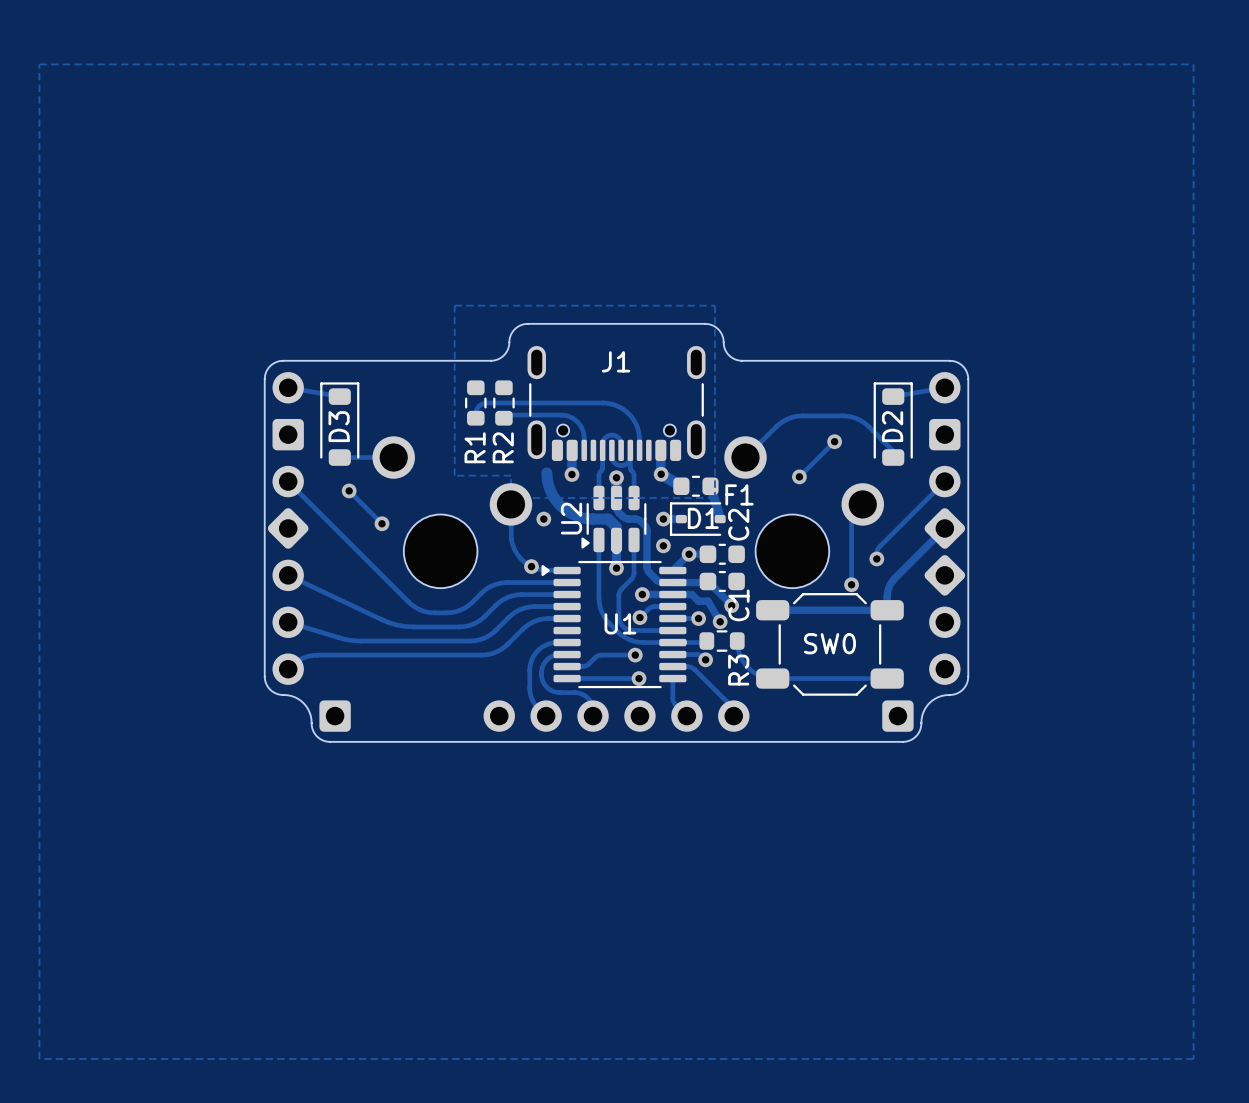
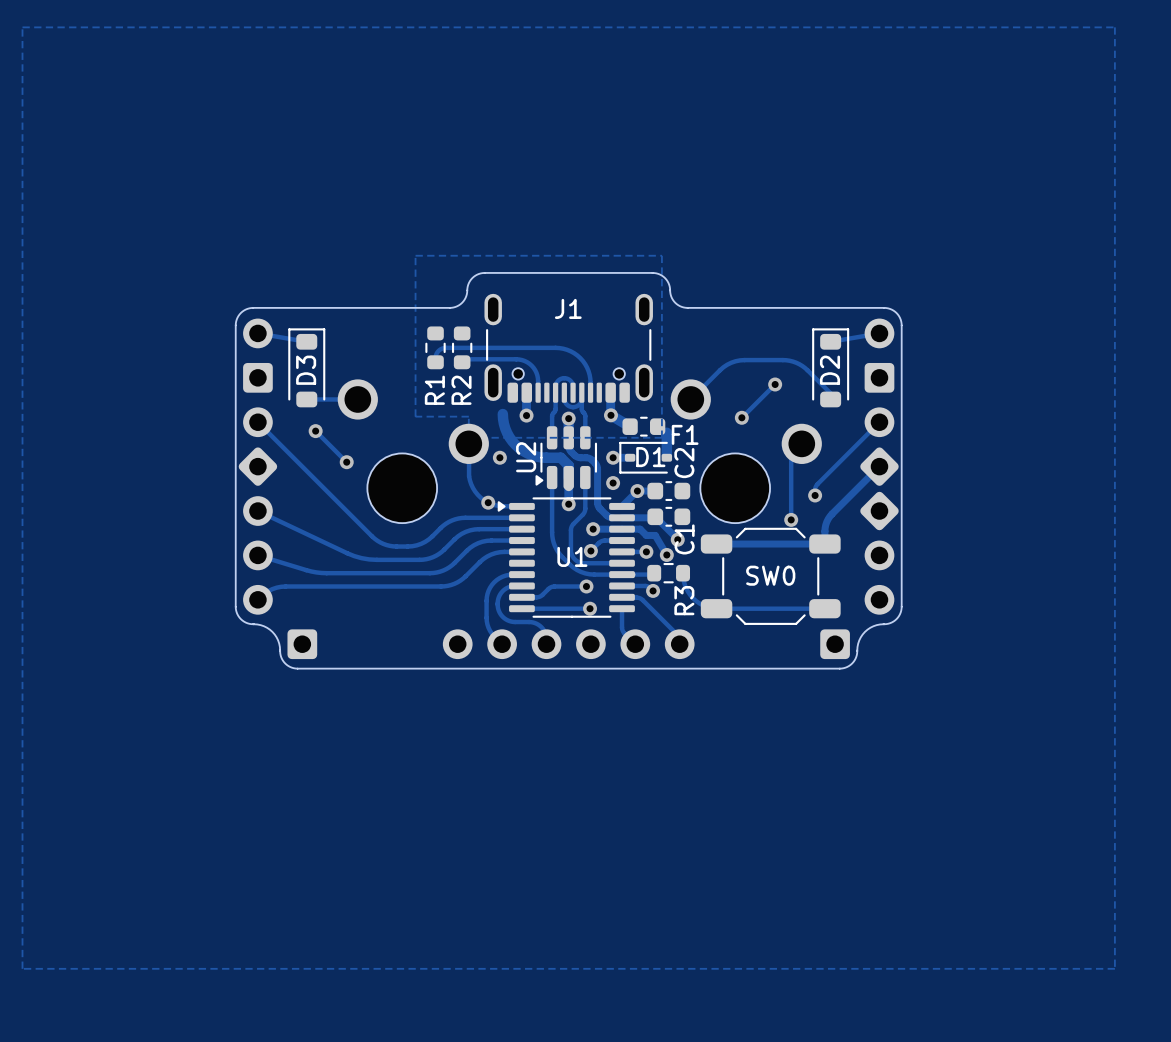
track: (710, 486) (720, 517) -> none
track: none -> (666, 432) (666, 454)

